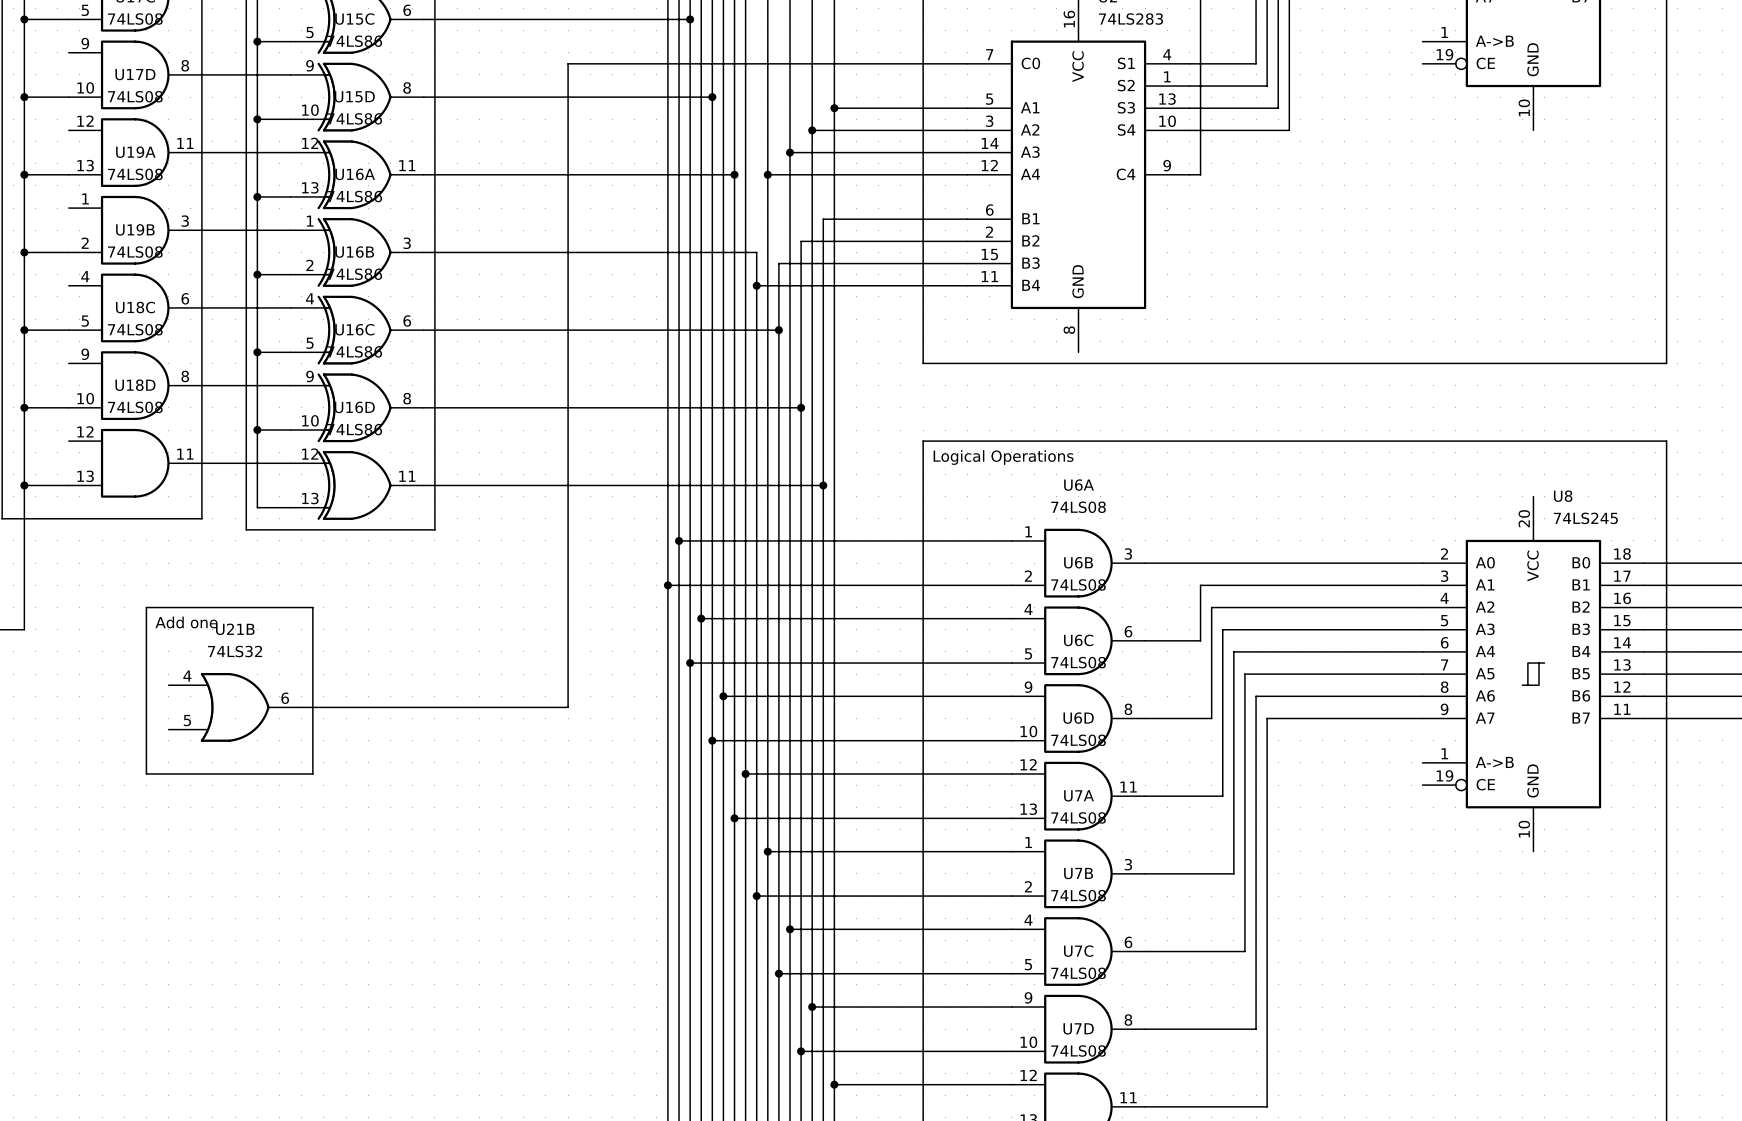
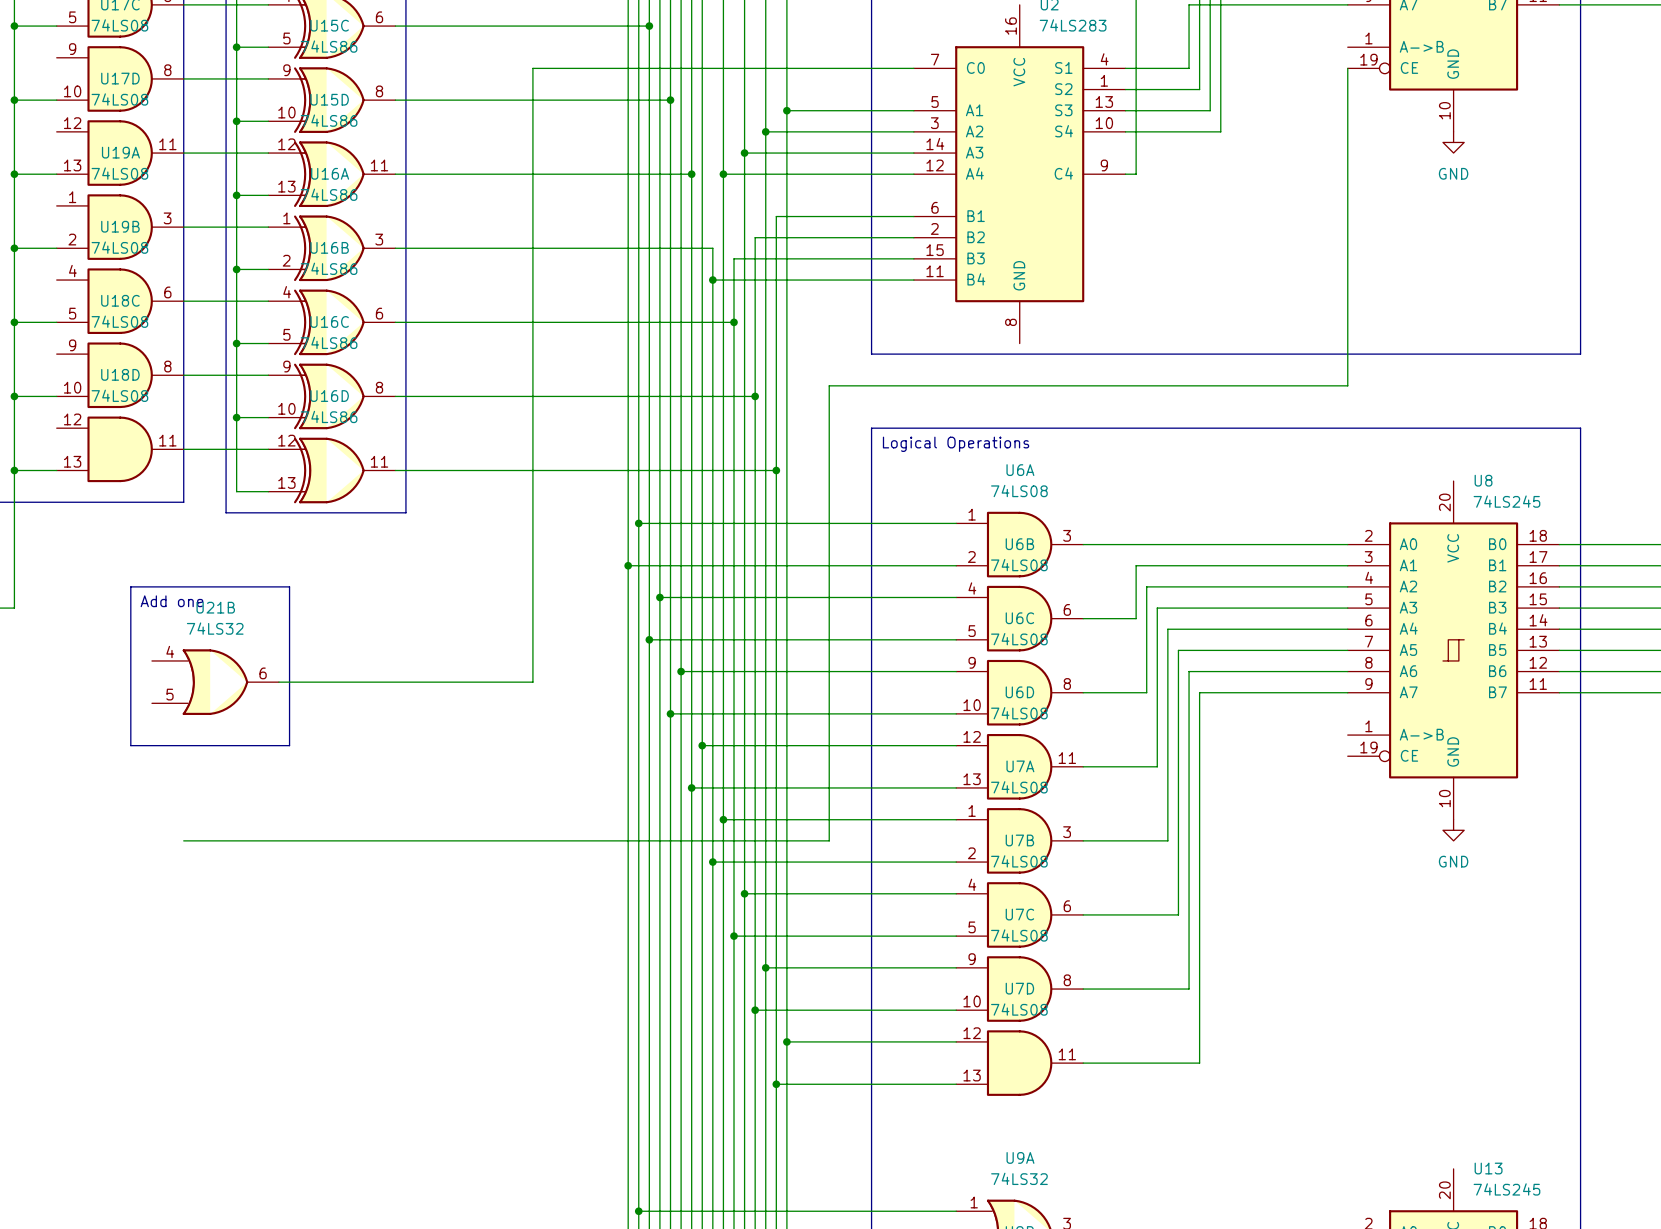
wire: none -> (1347, 68) (1347, 385) (829, 385) (829, 840) (183, 840)
power symbol: none -> GND (1453, 142)
power symbol: none -> GND (1453, 830)

